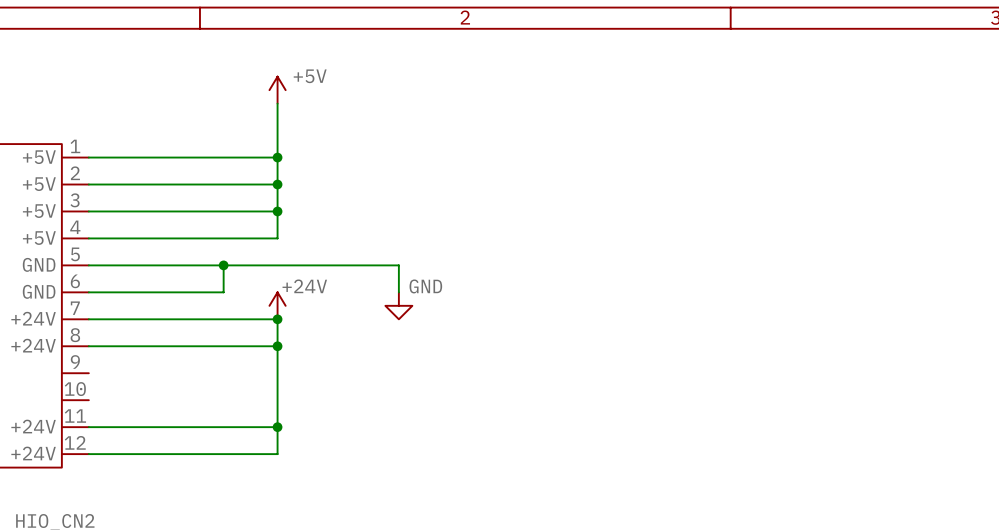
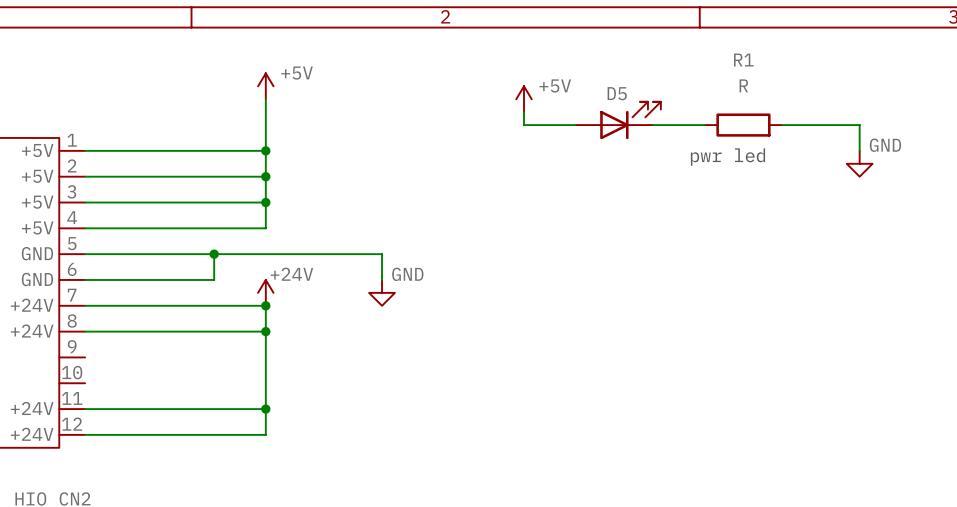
power symbol: none -> +5V (524, 99)
wire: none -> (524, 112) (524, 125) (575, 125)
D5: none -> (618, 120)
wire: none -> (653, 125) (704, 125)
R1: none -> R (743, 125)
wire: none -> (782, 125) (859, 125) (859, 150)
text: none -> pwr led (727, 157)
power symbol: none -> GND (859, 163)

